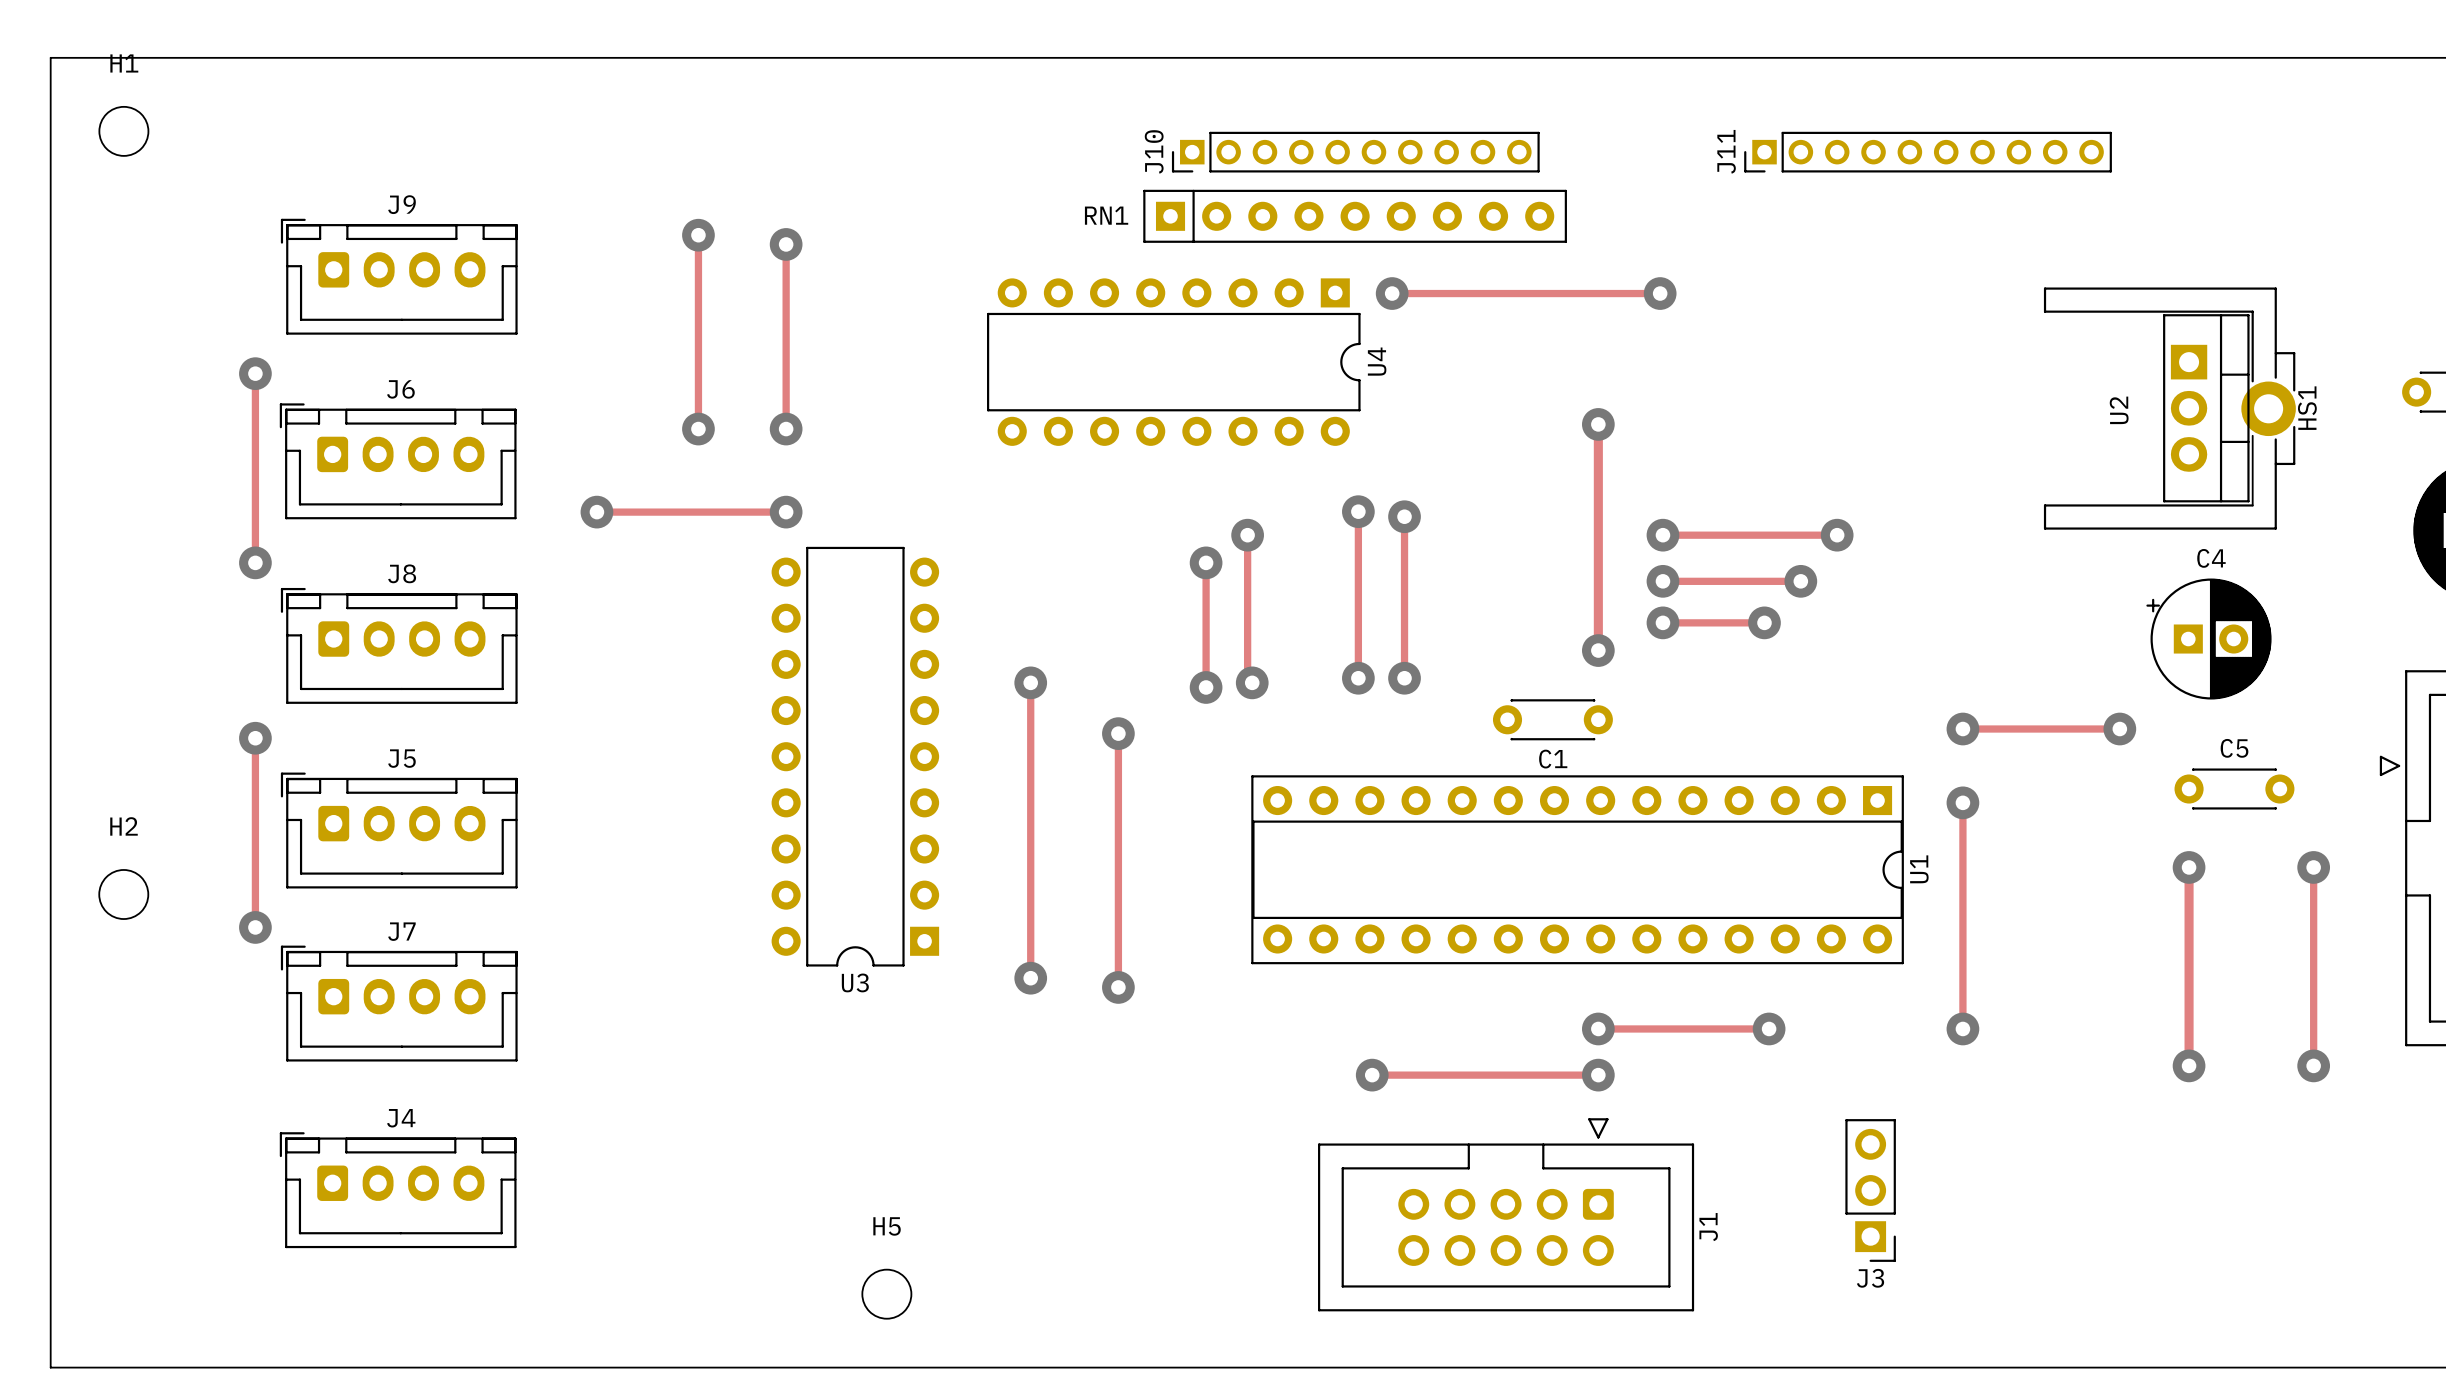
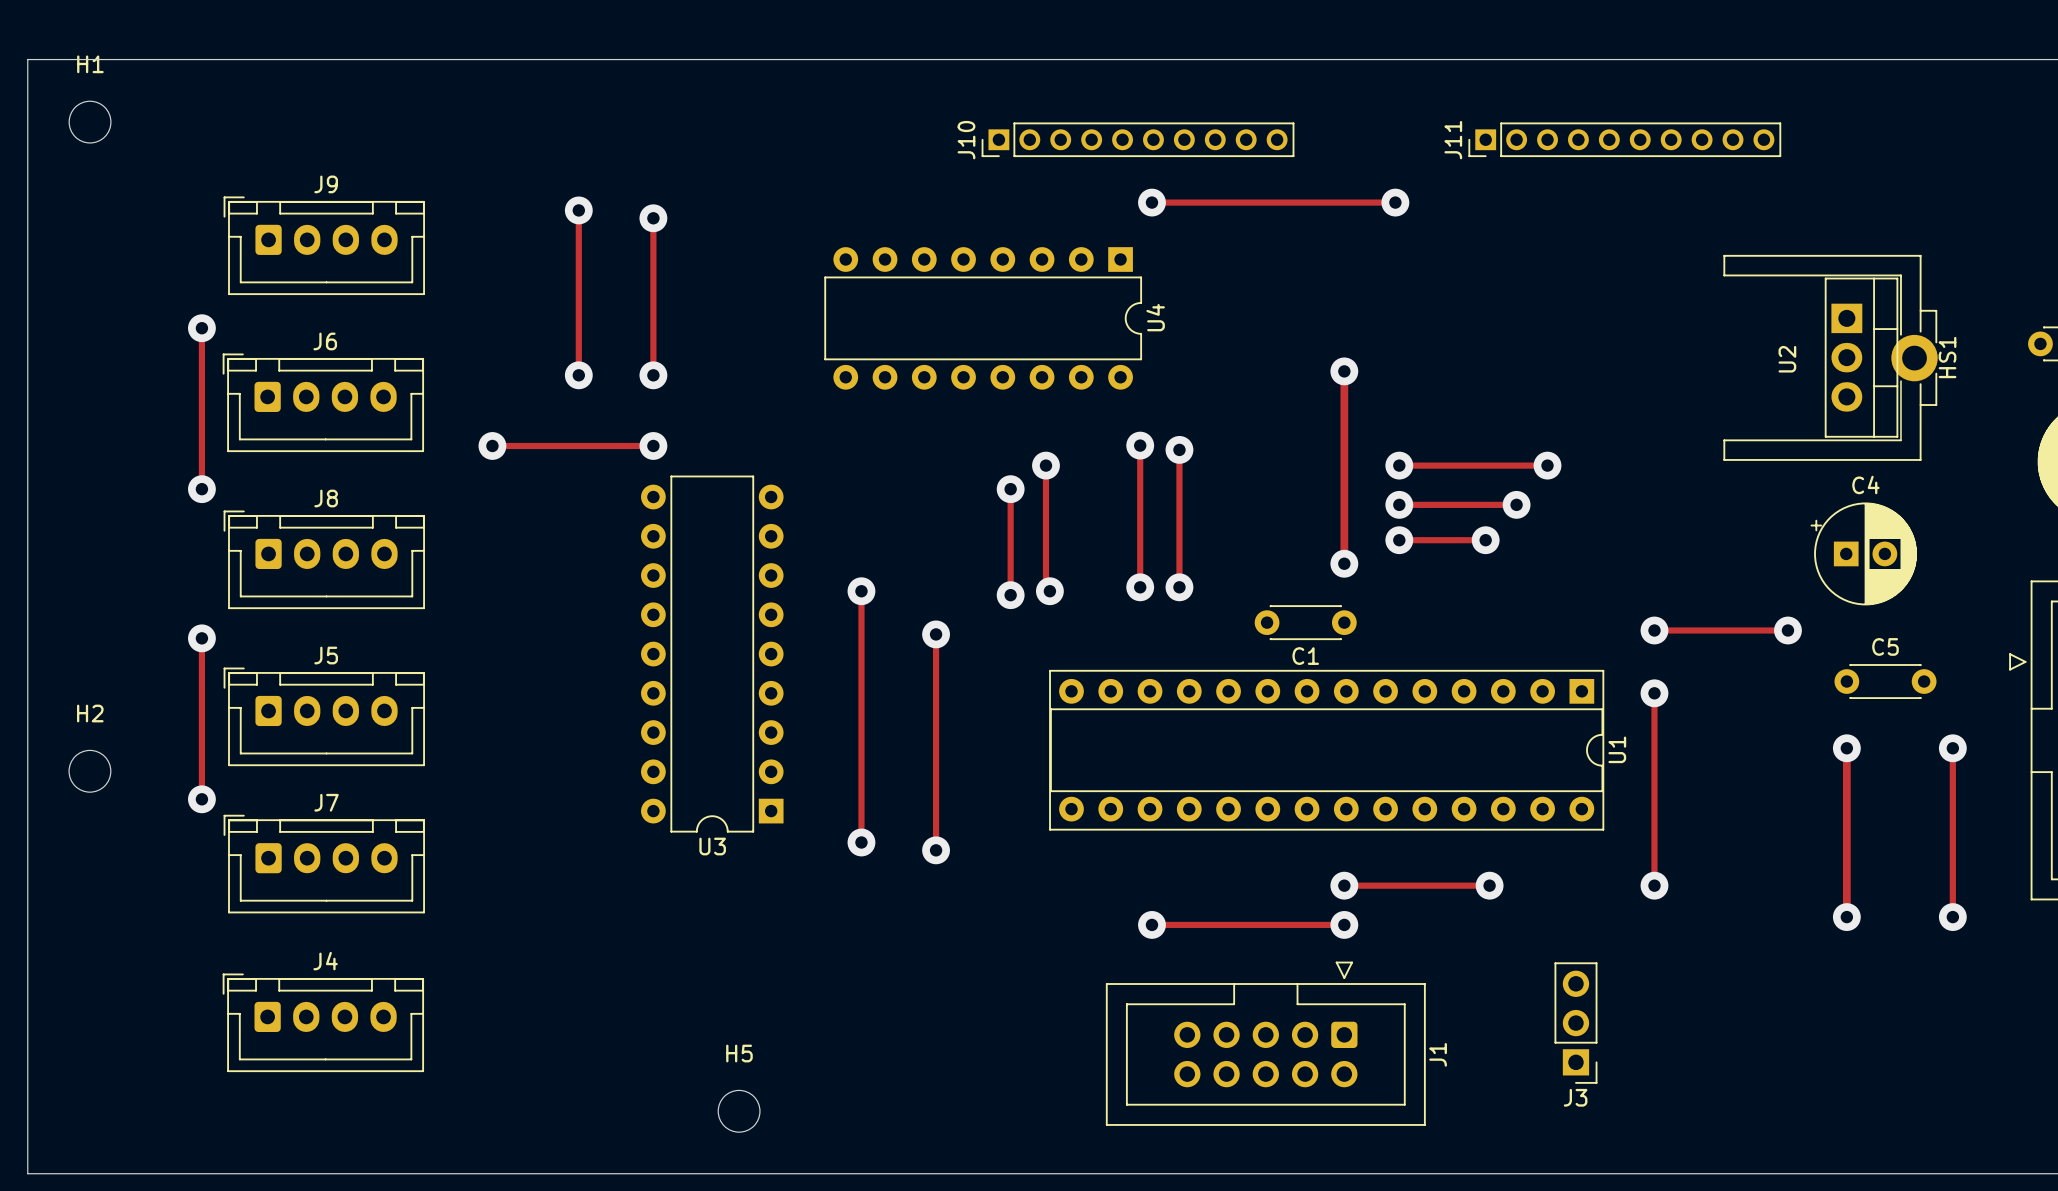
RN1: (1355, 216) -> none
track: none -> (1151, 202) (1395, 202)
track: (1392, 293) (1660, 293) -> none
via position: (1392, 293) -> (1151, 202)
via position: (1660, 293) -> (1395, 202)

